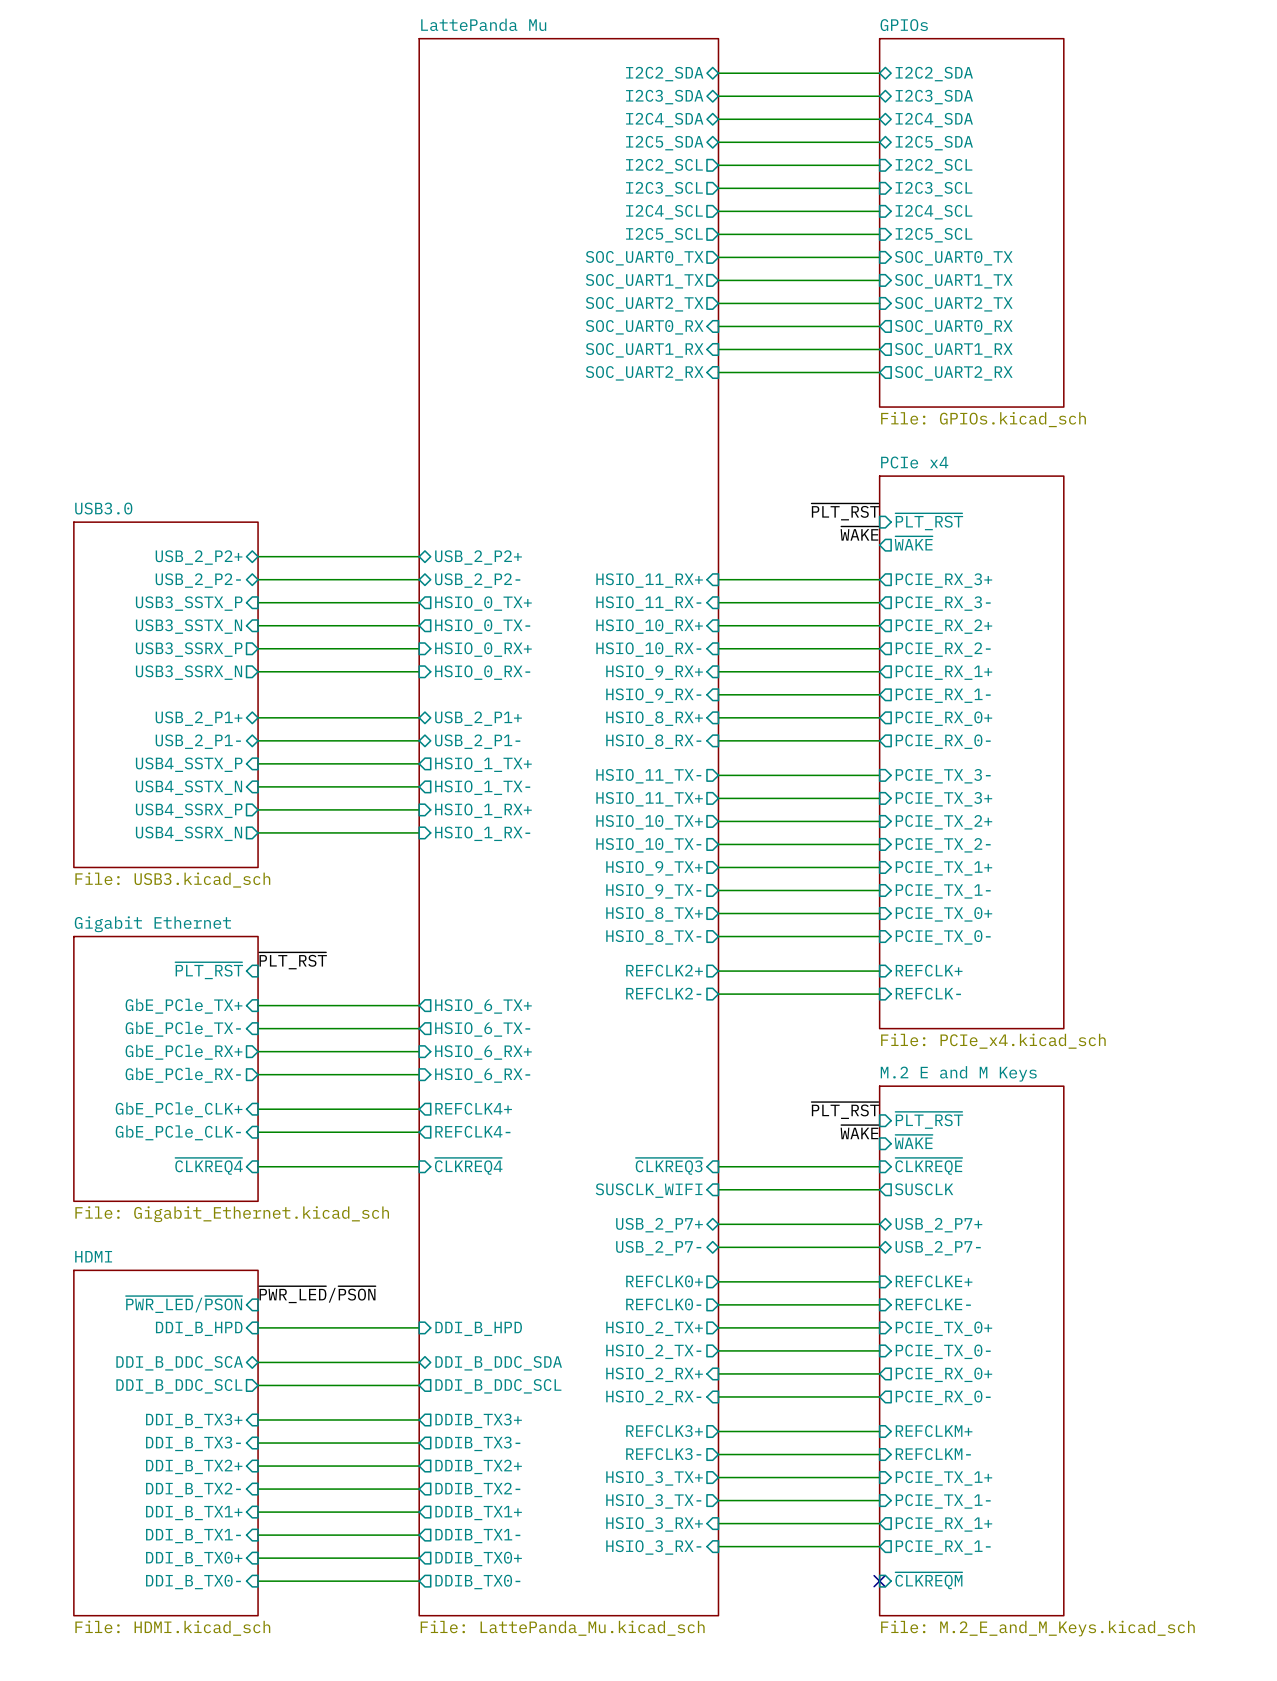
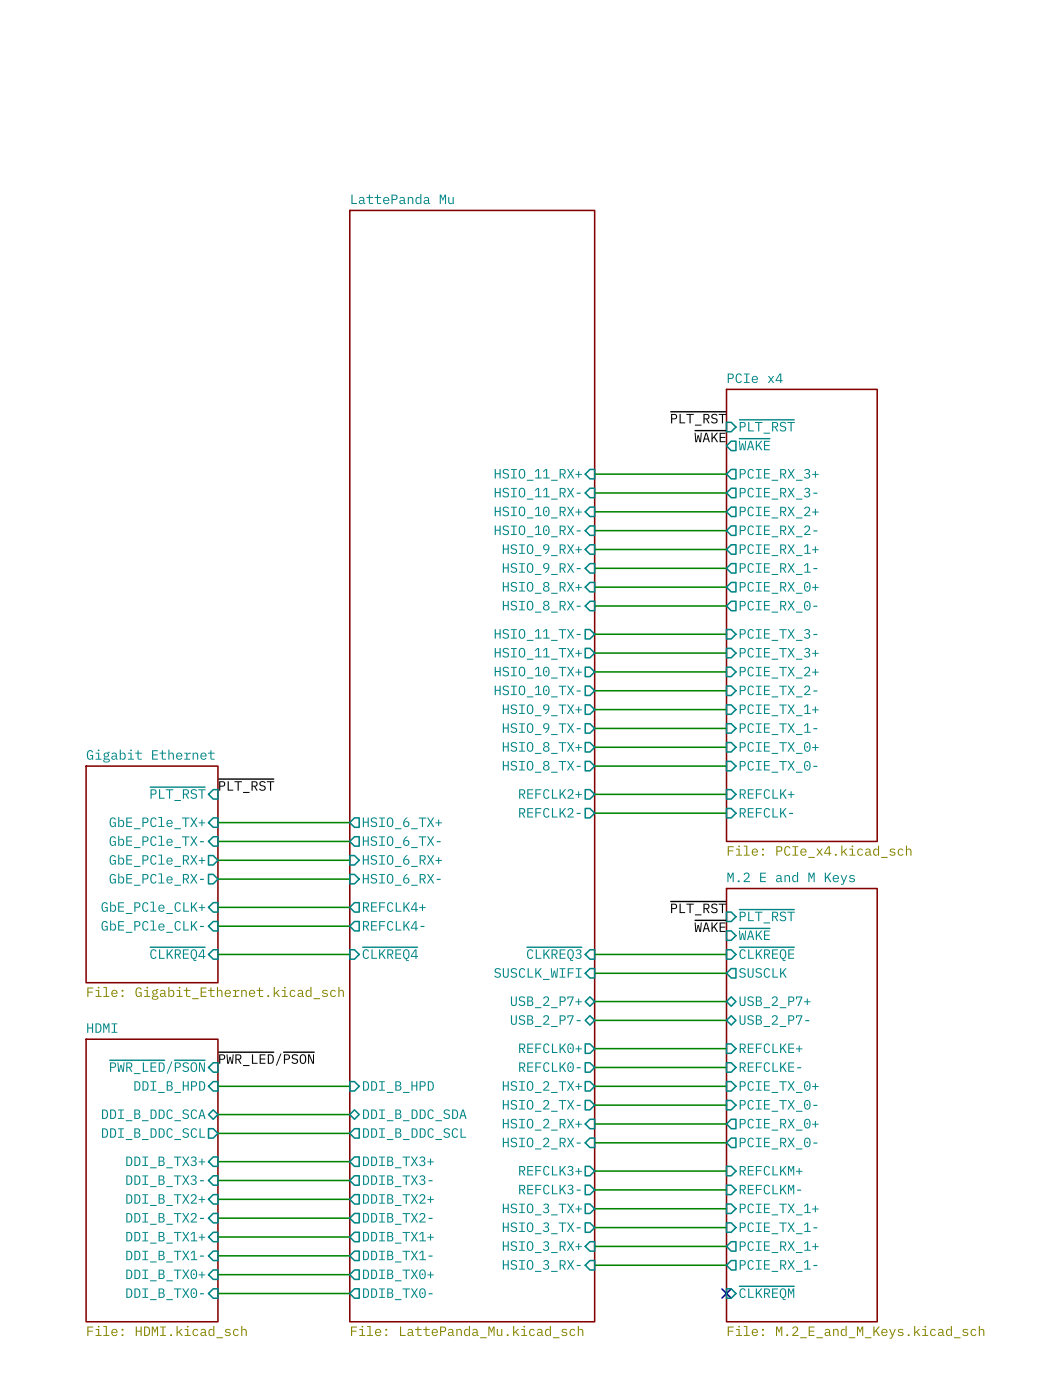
wire: (718, 73) (879, 73) -> none
sheet pin: I2C2_SDA (664, 74) -> none
sheet pin: I2C2_SDA (934, 74) -> none
wire: (718, 96) (879, 96) -> none
sheet pin: I2C3_SDA (664, 97) -> none
sheet pin: I2C3_SDA (934, 97) -> none
wire: (718, 119) (879, 119) -> none
sheet pin: I2C4_SDA (664, 120) -> none
sheet pin: I2C4_SDA (934, 120) -> none
wire: (718, 142) (879, 142) -> none
sheet pin: I2C5_SDA (664, 143) -> none
sheet pin: I2C5_SDA (934, 143) -> none
wire: (718, 165) (879, 165) -> none
sheet pin: I2C2_SCL (664, 166) -> none
sheet pin: I2C2_SCL (933, 166) -> none
wire: (718, 188) (879, 188) -> none
sheet pin: I2C3_SCL (664, 189) -> none
sheet pin: I2C3_SCL (933, 189) -> none
wire: (718, 211) (879, 211) -> none
sheet pin: I2C4_SCL (664, 212) -> none
sheet pin: I2C4_SCL (933, 212) -> none
sheet GPIOs: File: GPIOs.kicad_sch (971, 222) -> none
wire: (718, 234) (879, 234) -> none
sheet pin: I2C5_SCL (664, 235) -> none
sheet pin: I2C5_SCL (933, 235) -> none
wire: (718, 257) (879, 257) -> none
sheet pin: SOC_UART0_TX (644, 258) -> none
sheet pin: SOC_UART0_TX (953, 258) -> none
wire: (718, 280) (879, 280) -> none
sheet pin: SOC_UART1_TX (644, 281) -> none
sheet pin: SOC_UART1_TX (953, 281) -> none
wire: (718, 303) (879, 303) -> none
sheet pin: SOC_UART2_TX (644, 304) -> none
sheet pin: SOC_UART2_TX (953, 304) -> none
wire: (718, 326) (879, 326) -> none
sheet pin: SOC_UART0_RX (644, 327) -> none
sheet pin: SOC_UART0_RX (953, 327) -> none
wire: (718, 349) (879, 349) -> none
sheet pin: SOC_UART1_RX (644, 350) -> none
sheet pin: SOC_UART1_RX (953, 350) -> none
wire: (718, 372) (879, 372) -> none
sheet pin: SOC_UART2_RX (644, 373) -> none
sheet pin: SOC_UART2_RX (953, 373) -> none
wire: (258, 556) (419, 556) -> none
sheet pin: USB_2_P2+ (199, 557) -> none
sheet pin: USB_2_P2+ (478, 557) -> none
wire: (258, 579) (419, 579) -> none
sheet pin: USB_2_P2- (198, 580) -> none
sheet pin: USB_2_P2- (477, 580) -> none
wire: (258, 602) (419, 602) -> none
sheet pin: USB3_SSTX_P (189, 603) -> none
sheet pin: HSIO_0_TX+ (483, 603) -> none
wire: (258, 625) (419, 625) -> none
sheet pin: USB3_SSTX_N (189, 626) -> none
sheet pin: HSIO_0_TX- (482, 626) -> none
wire: (258, 648) (419, 648) -> none
sheet pin: USB3_SSRX_P (189, 649) -> none
sheet pin: HSIO_0_RX+ (483, 649) -> none
wire: (258, 671) (419, 671) -> none
sheet pin: USB3_SSRX_N (189, 672) -> none
sheet pin: HSIO_0_RX- (482, 672) -> none
sheet USB3.0: File: USB3.kicad_sch (165, 694) -> none
wire: (258, 717) (419, 717) -> none
sheet pin: USB_2_P1+ (199, 718) -> none
sheet pin: USB_2_P1+ (478, 718) -> none
wire: (258, 740) (419, 740) -> none
sheet pin: USB_2_P1- (198, 741) -> none
sheet pin: USB_2_P1- (477, 741) -> none
wire: (258, 763) (419, 763) -> none
sheet pin: USB4_SSTX_P (189, 764) -> none
sheet pin: HSIO_1_TX+ (483, 764) -> none
wire: (258, 786) (419, 786) -> none
sheet pin: USB4_SSTX_N (189, 787) -> none
sheet pin: HSIO_1_TX- (482, 787) -> none
wire: (258, 809) (419, 809) -> none
sheet pin: USB4_SSRX_P (189, 810) -> none
sheet pin: HSIO_1_RX+ (483, 810) -> none
sheet LattePanda Mu: File: LattePanda_Mu.kicad_sch (568, 827) -> none
wire: (258, 832) (419, 832) -> none
sheet pin: USB4_SSRX_N (189, 833) -> none
sheet pin: HSIO_1_RX- (482, 833) -> none
sheet LattePanda Mu: none -> File: LattePanda_Mu.kicad_sch (472, 766)
sheet Gigabit Ethernet: File: Gigabit_Ethernet.kicad_sch (165, 1068) -> none
sheet Gigabit Ethernet: none -> File: Gigabit_Ethernet.kicad_sch (152, 874)
sheet HDMI: File: HDMI.kicad_sch (165, 1443) -> none
sheet HDMI: none -> File: HDMI.kicad_sch (152, 1180)

